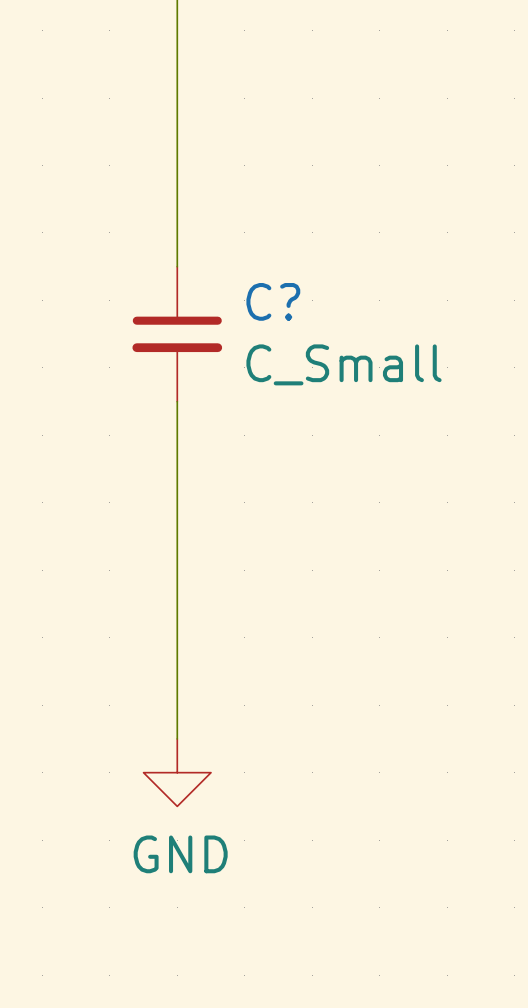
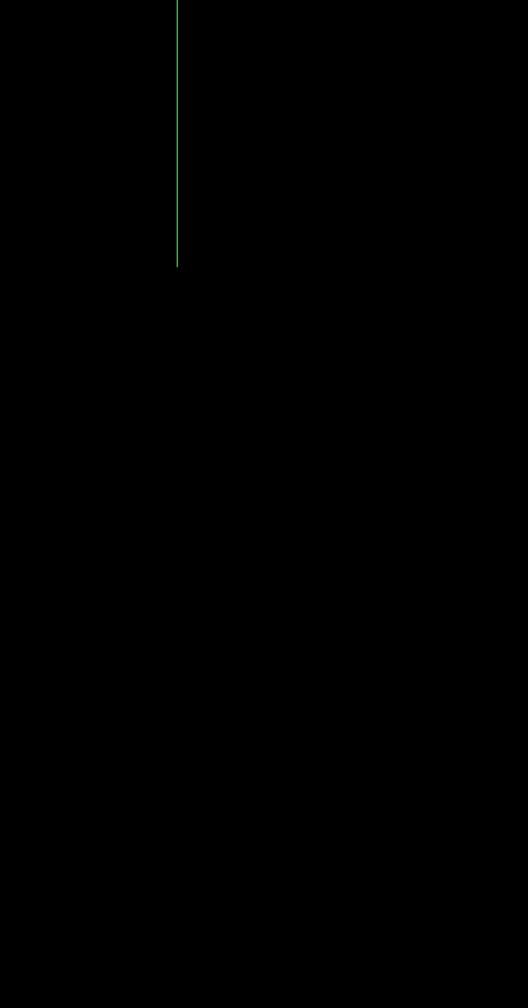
C?: C_Small (177, 334) -> none
wire: (177, 401) (177, 738) -> none
power symbol: GND (177, 772) -> none

